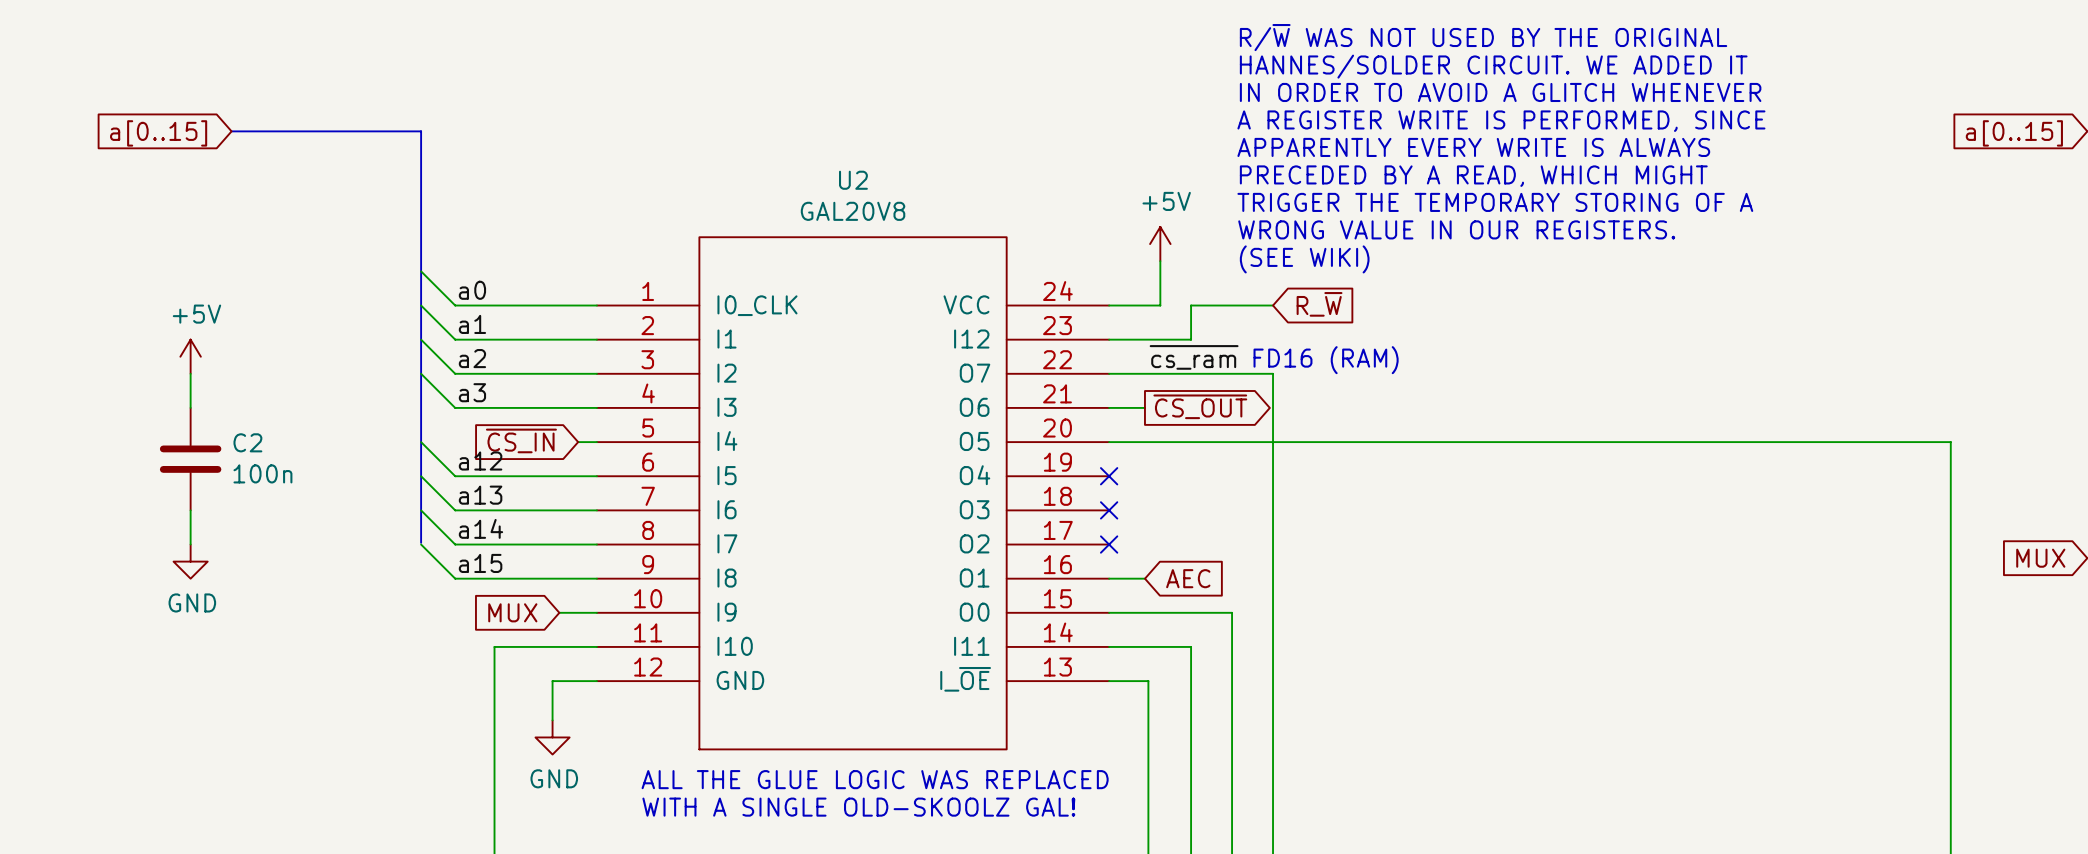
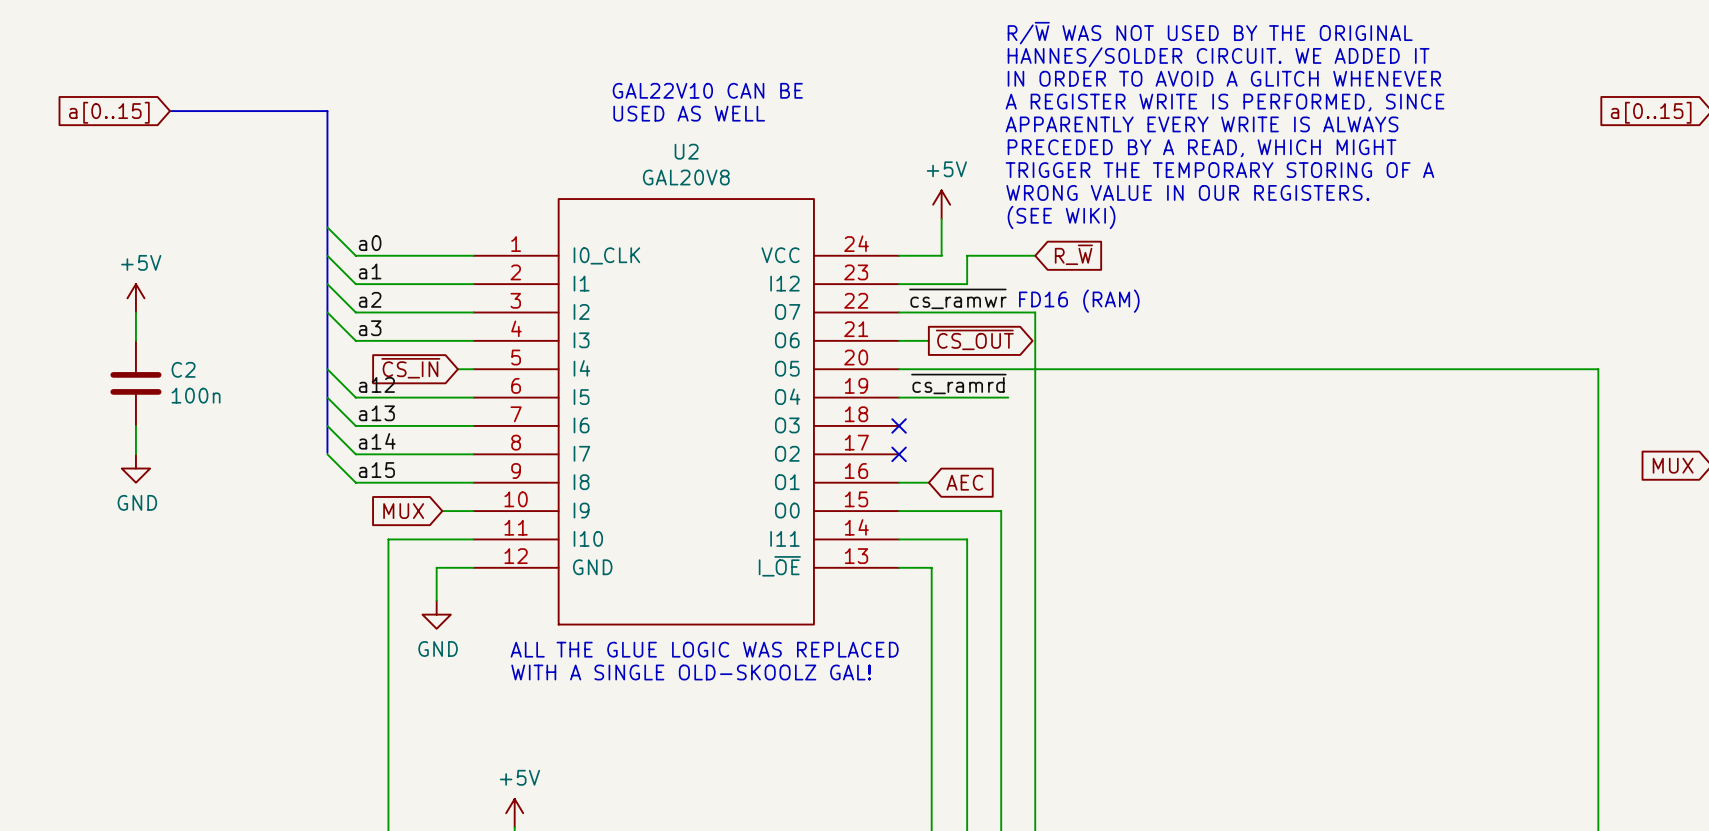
text: none -> GAL22V10 CAN BE (707, 90)
text: none -> USED AS WELL (689, 113)
label: ~{cs_ram} (1194, 357) -> ~{cs_ramwr} (957, 298)
label: none -> ~{cs_ramrd} (958, 383)
wire: none -> (899, 397) (1008, 397)
no-connect mark: (1109, 476) -> none

